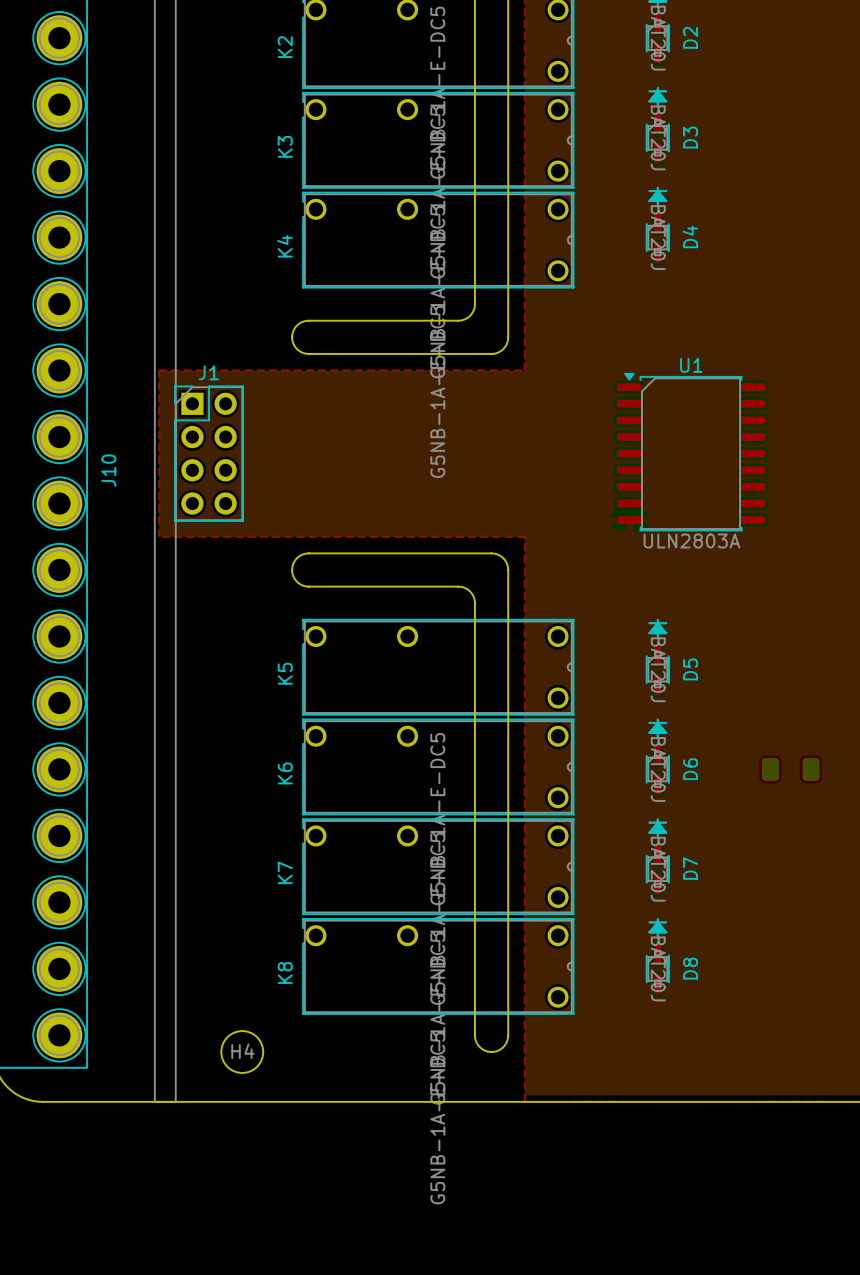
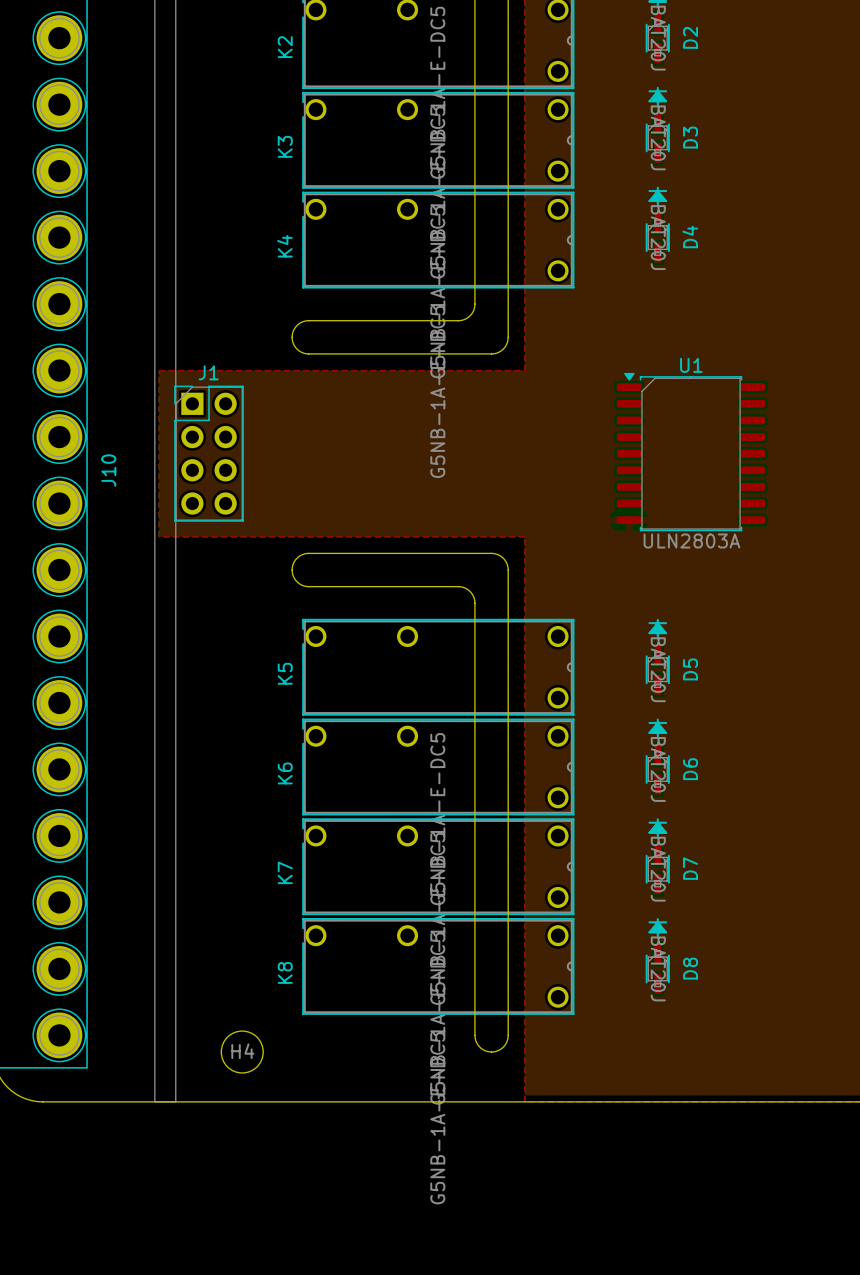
part: (790, 769) -> none

